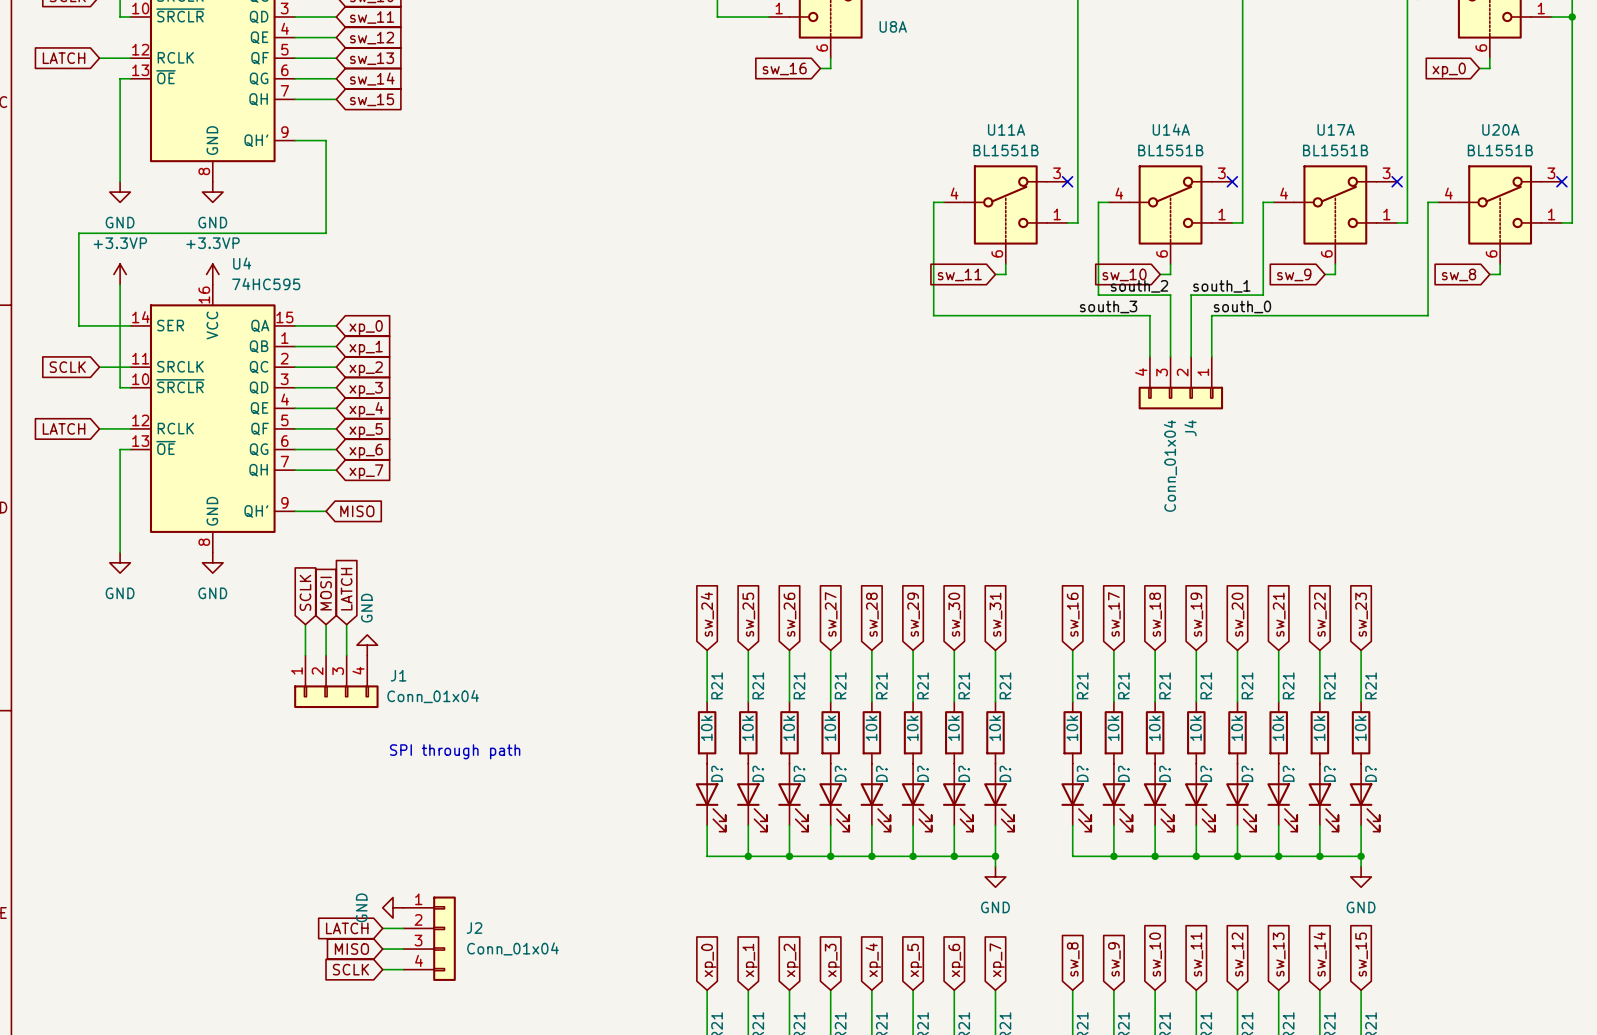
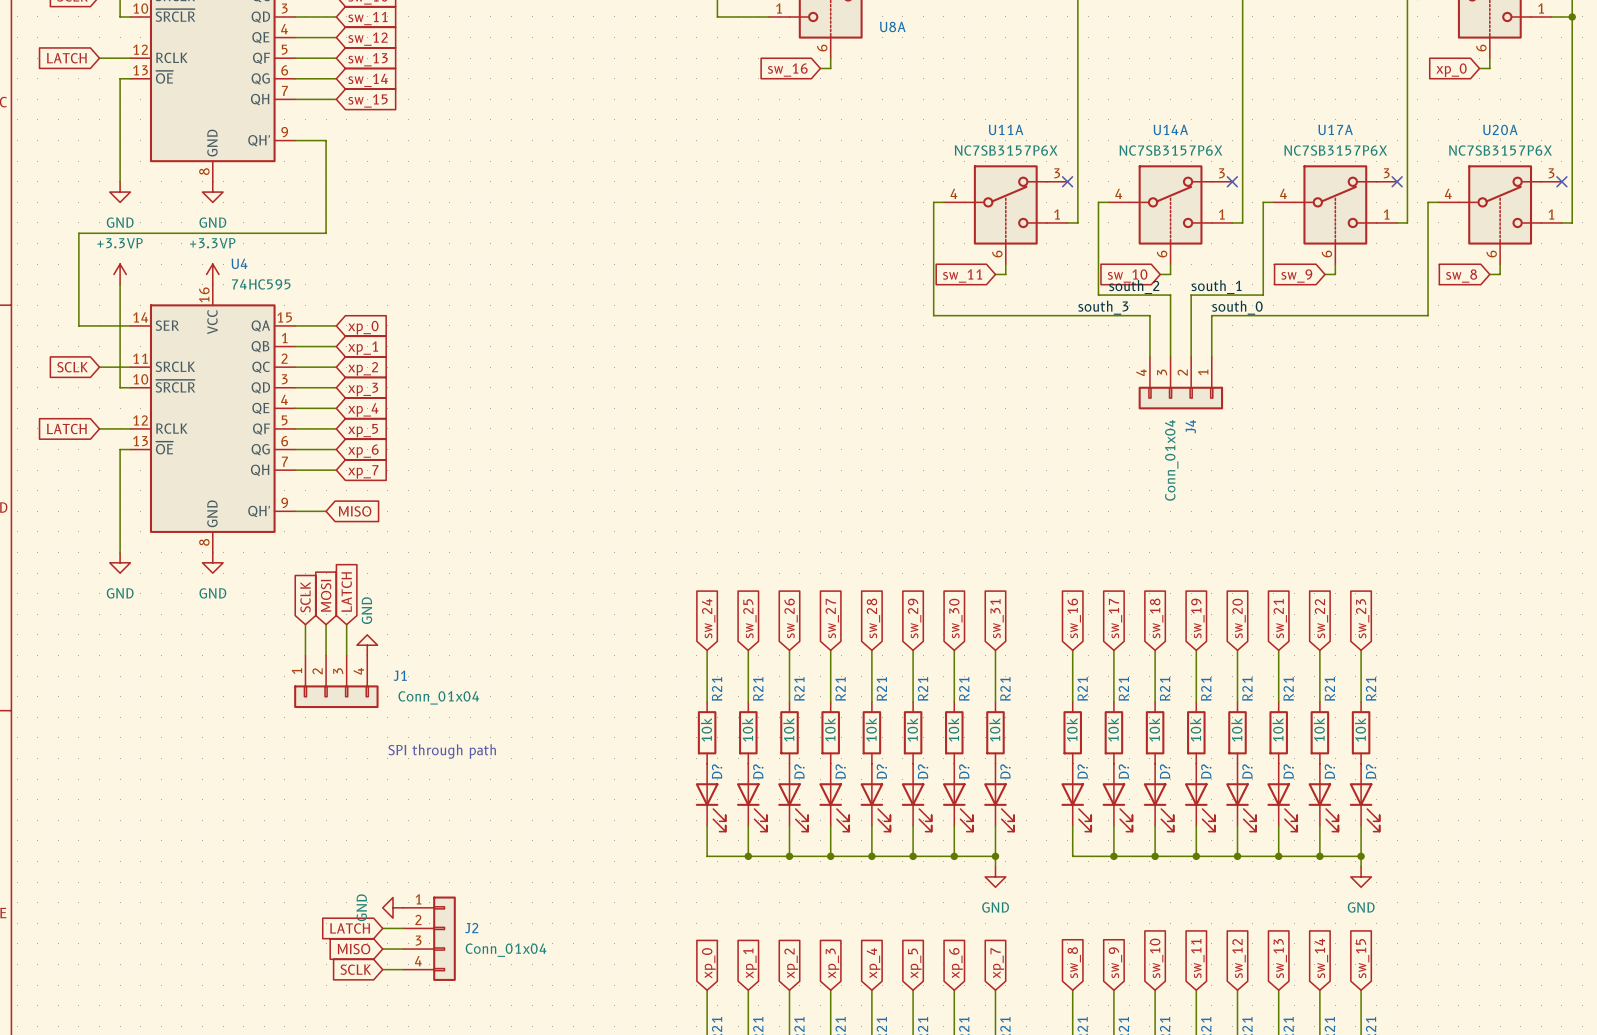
U11A value: BL1551B (1006, 150) -> NC7SB3157P6X (1006, 150)
U14A value: BL1551B (1170, 150) -> NC7SB3157P6X (1170, 150)
U17A value: BL1551B (1335, 150) -> NC7SB3157P6X (1335, 150)
U20A value: BL1551B (1500, 150) -> NC7SB3157P6X (1500, 150)

